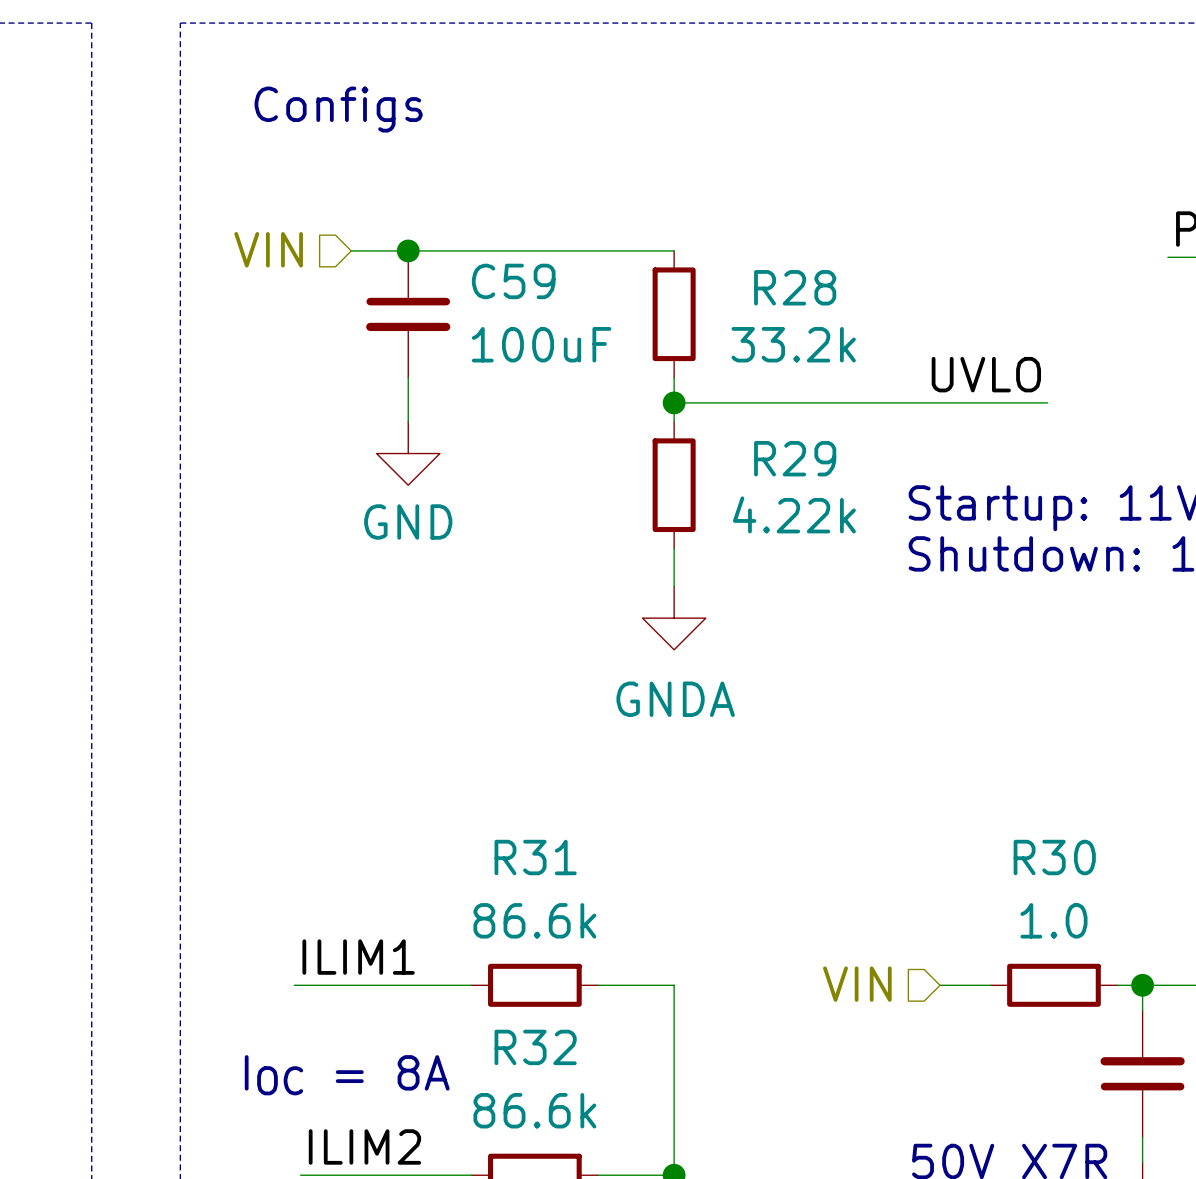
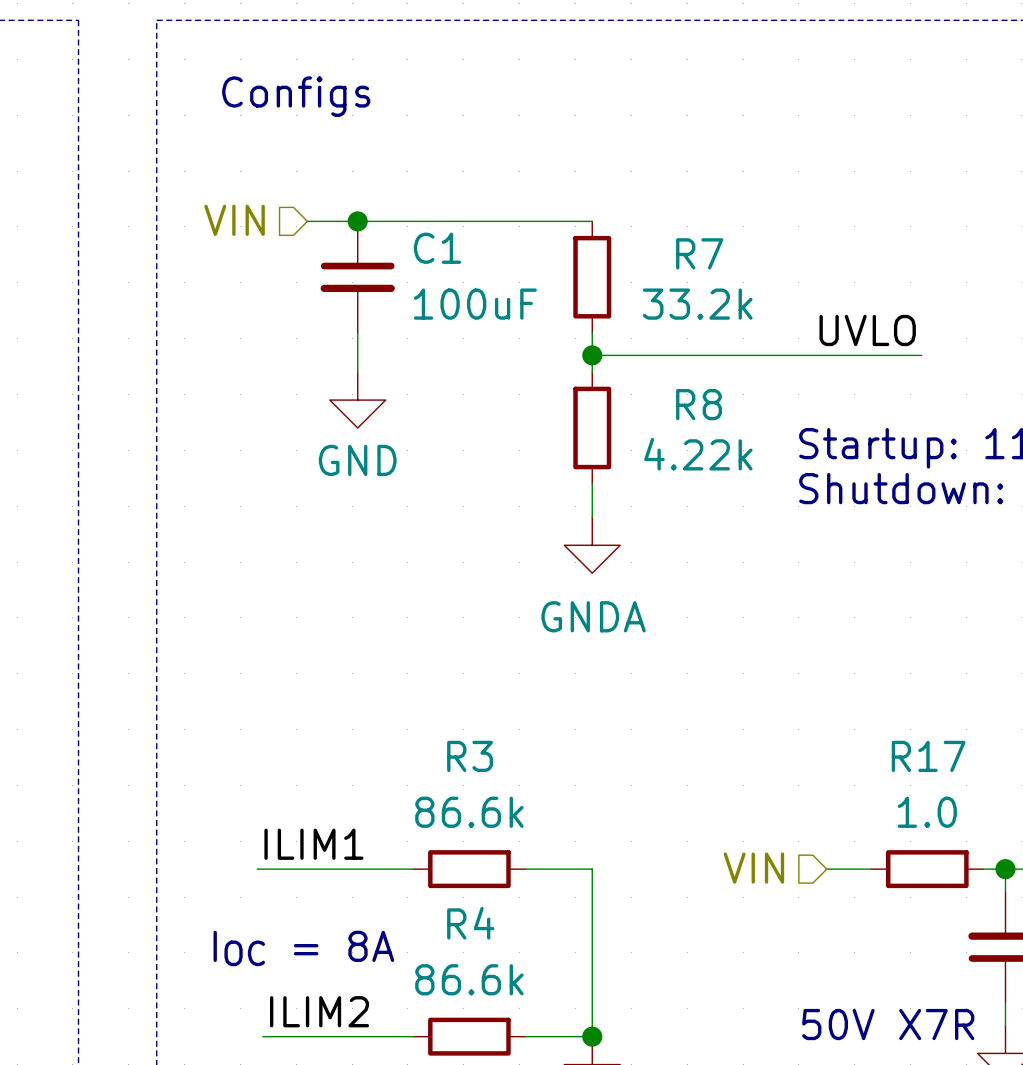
C59 name: C59 (513, 281) -> C1 (437, 248)
R28 name: R28 (795, 287) -> R7 (699, 253)
R29 name: R29 (795, 458) -> R8 (699, 404)
R31 name: R31 (535, 857) -> R3 (470, 756)
R30 name: R30 (1054, 857) -> R17 (928, 756)
R32 name: R32 (535, 1047) -> R4 (470, 923)

